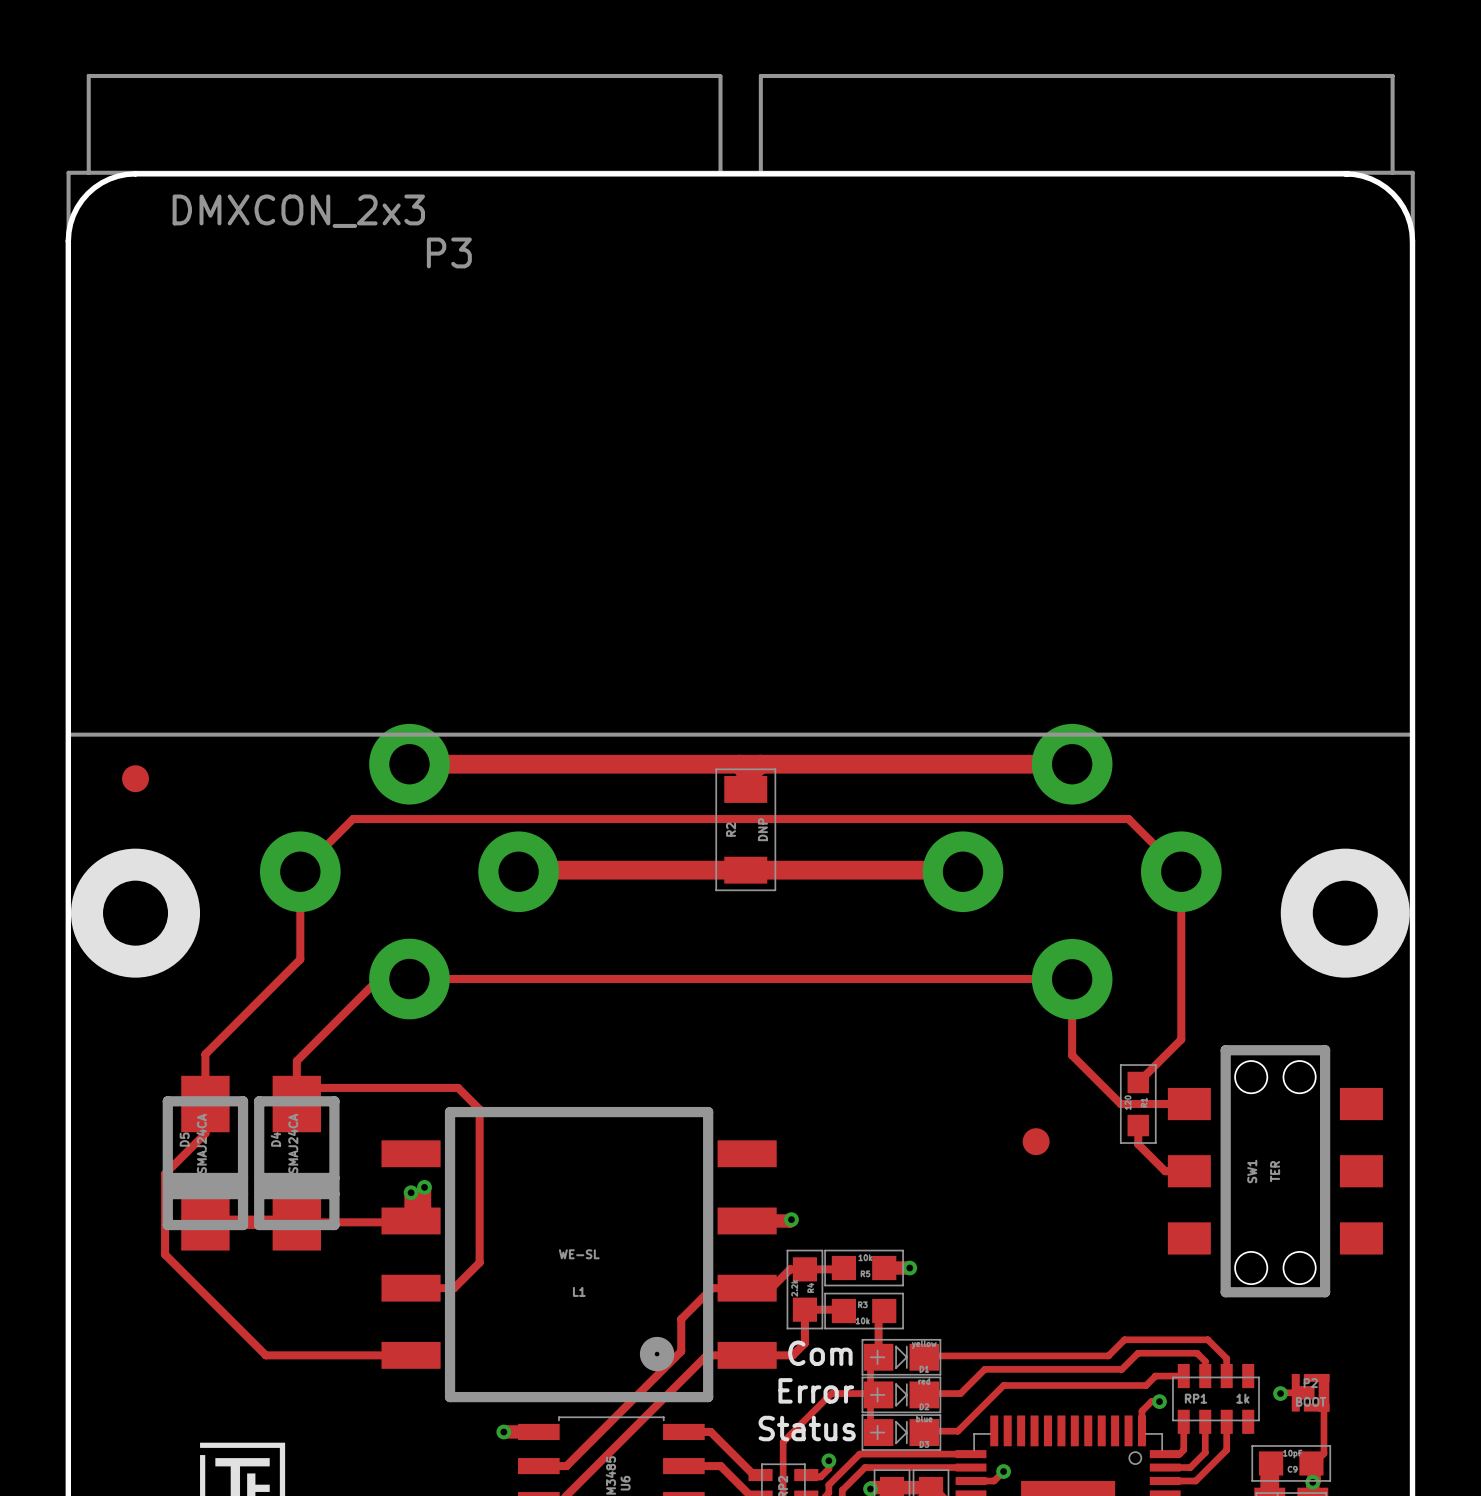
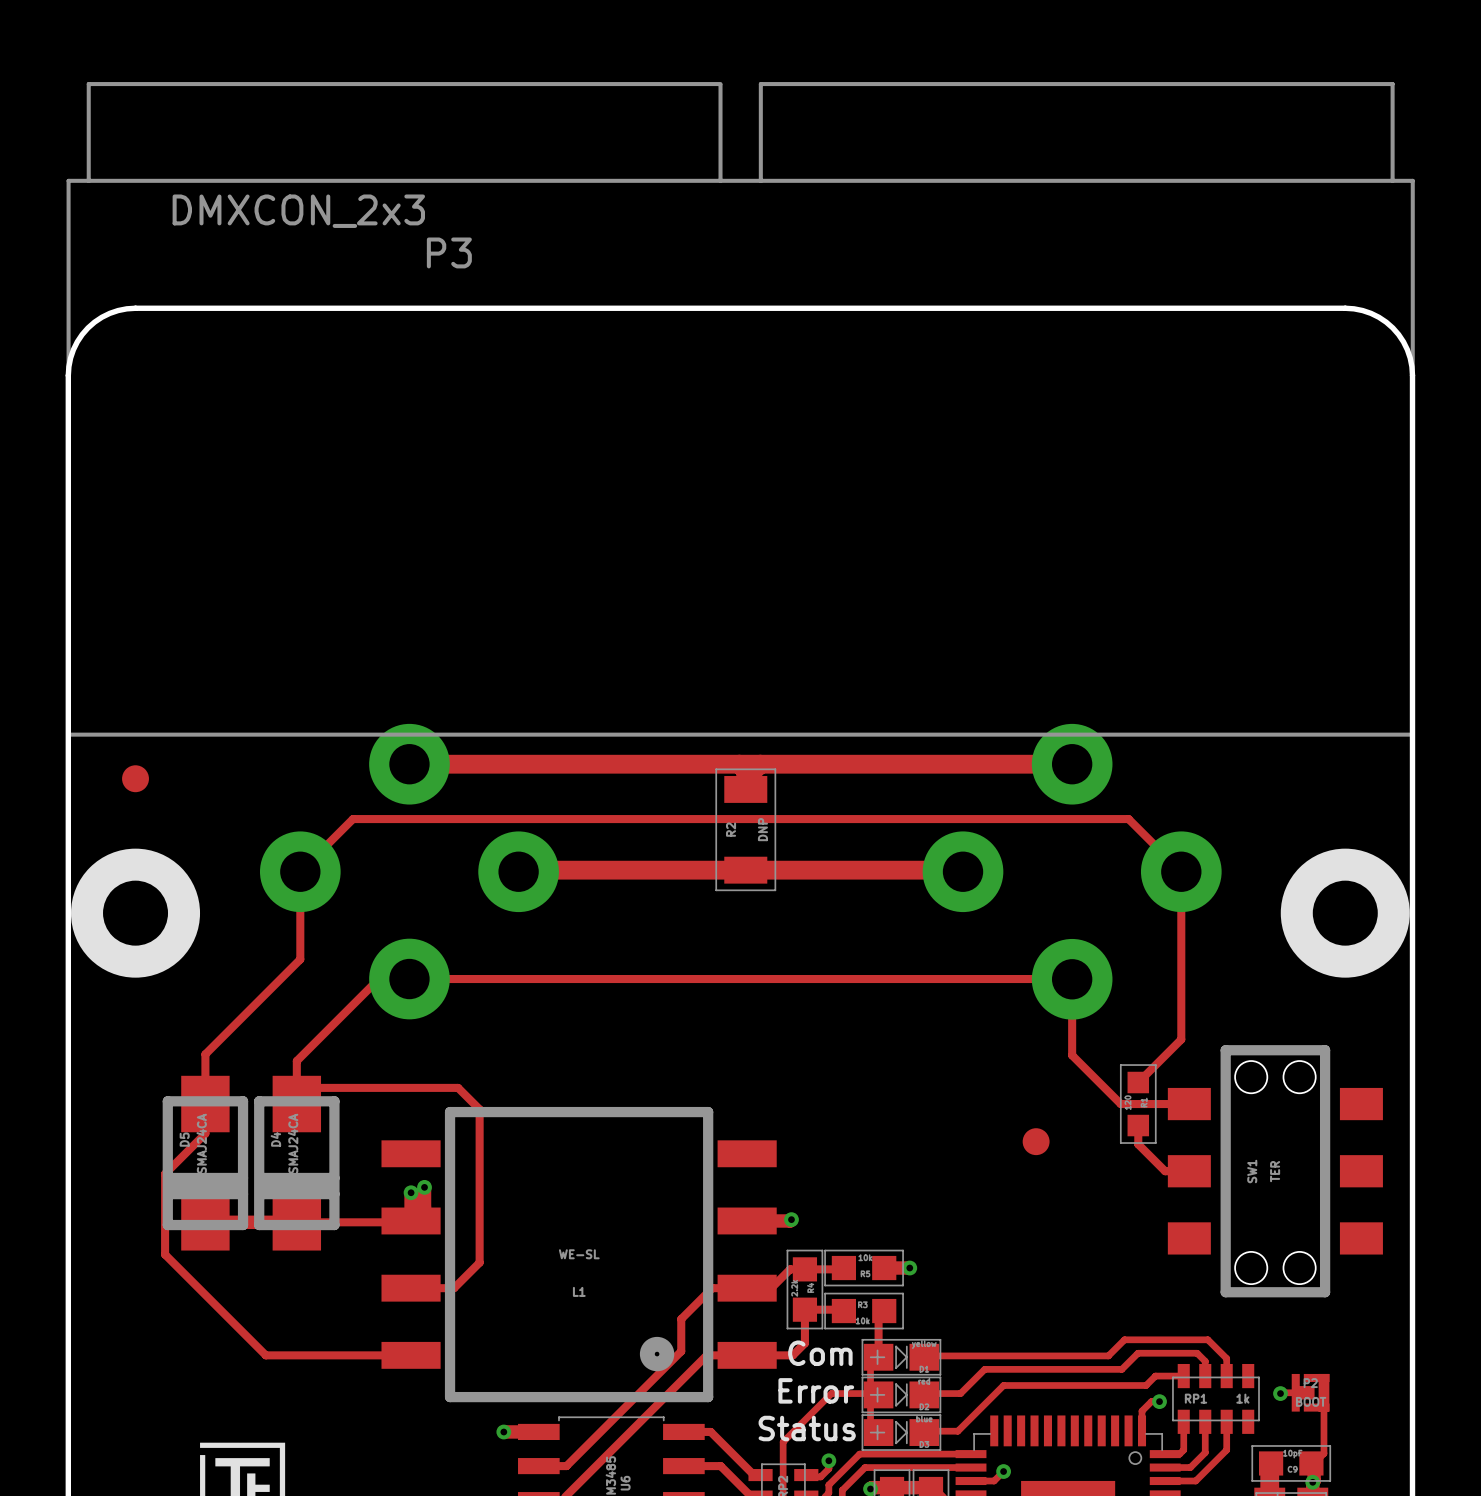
P3 footprint: [66, 73, 1415, 1020] -> [66, 82, 1415, 1020]
board edge: (1345, 173) (1371, 178) (1386, 187) (1403, 207) (1410, 223) (1412, 241) (1412, 375) -> none
board edge: (1347, 173) (126, 174) (109, 178) (94, 187) (82, 200) (70, 223) (68, 241) (68, 375) -> (1412, 375) (1407, 349) (1392, 327) (1371, 313) (1345, 308) (135, 308) (109, 313) (87, 327) (73, 349) (68, 375)

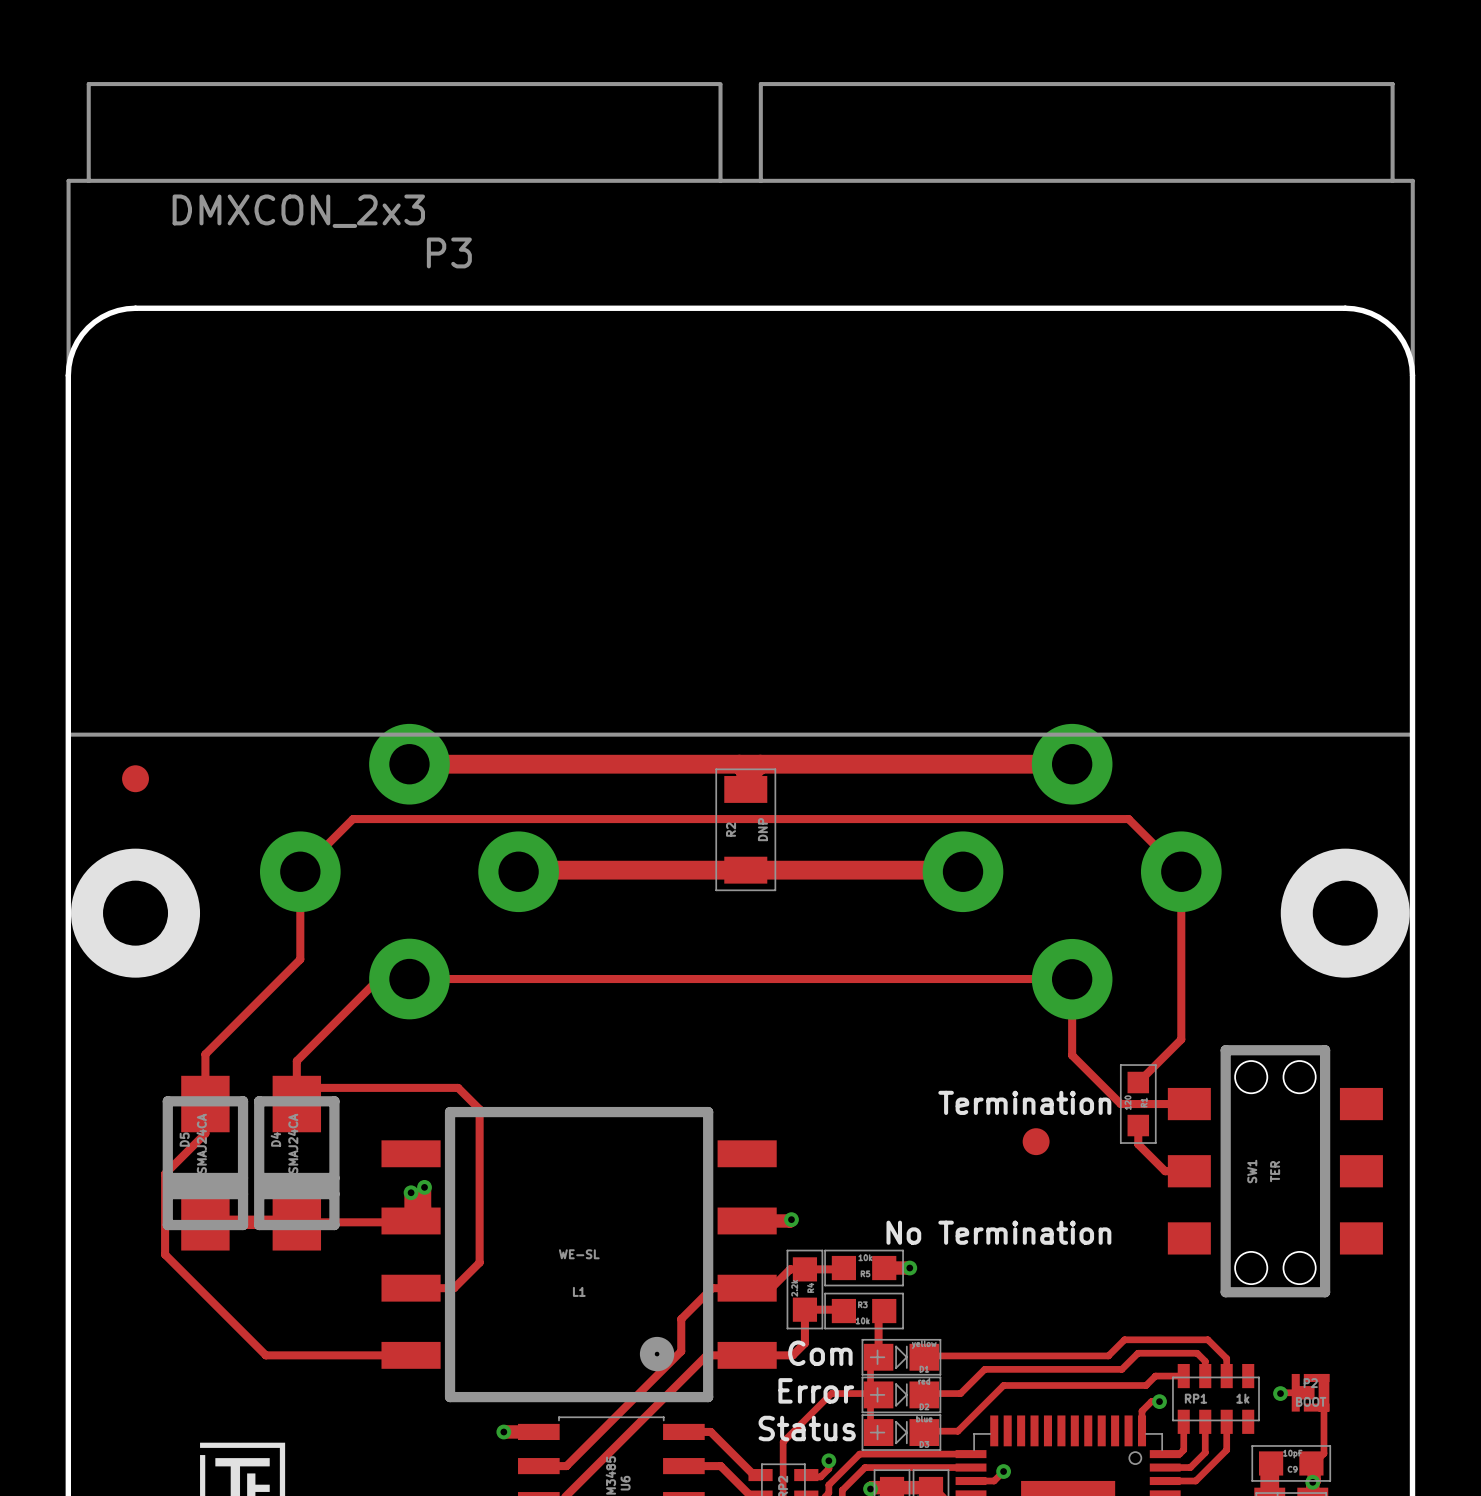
text: none -> Termination (1024, 1102)
text: none -> No Termination (998, 1232)

